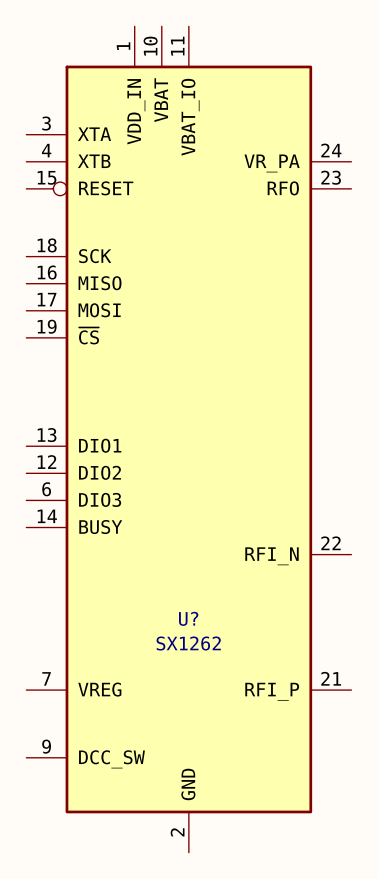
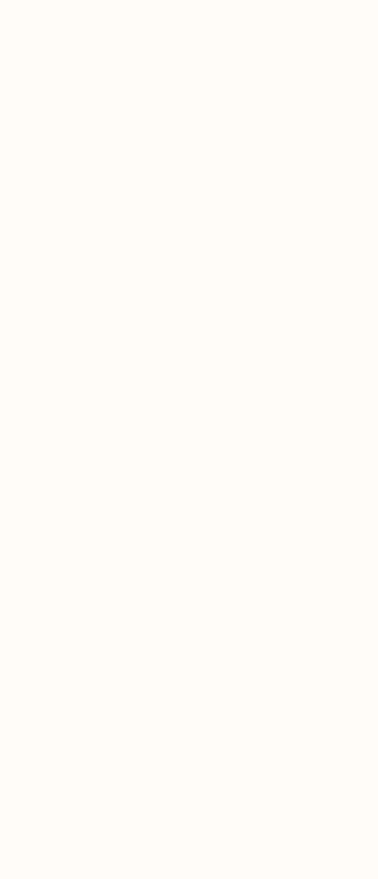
U?: SX1262 (188, 439) -> none

